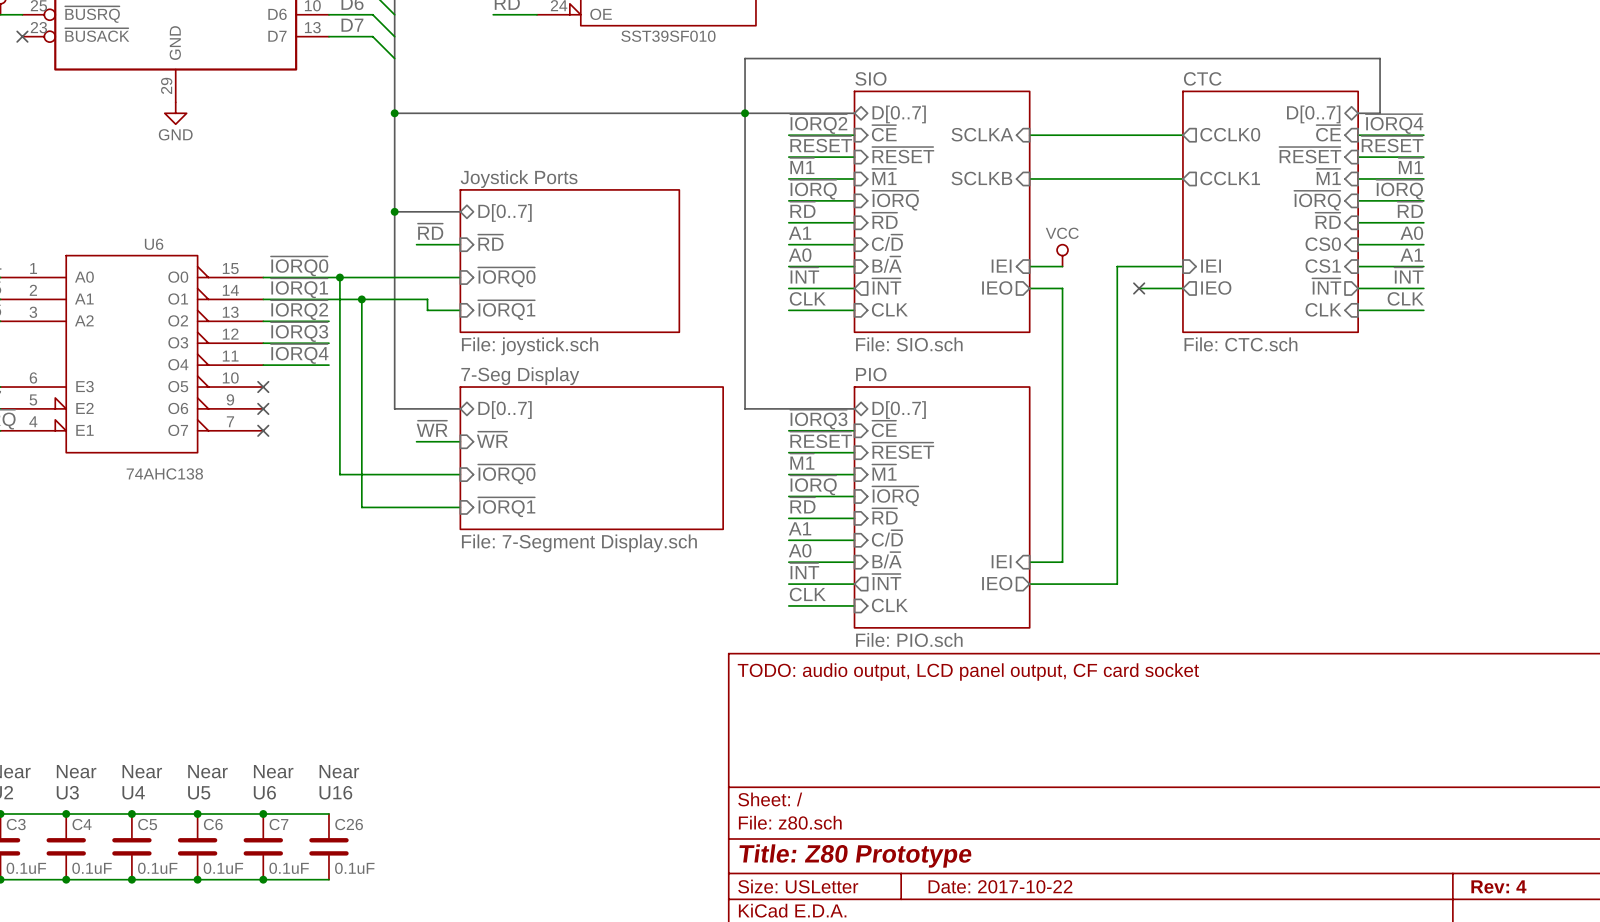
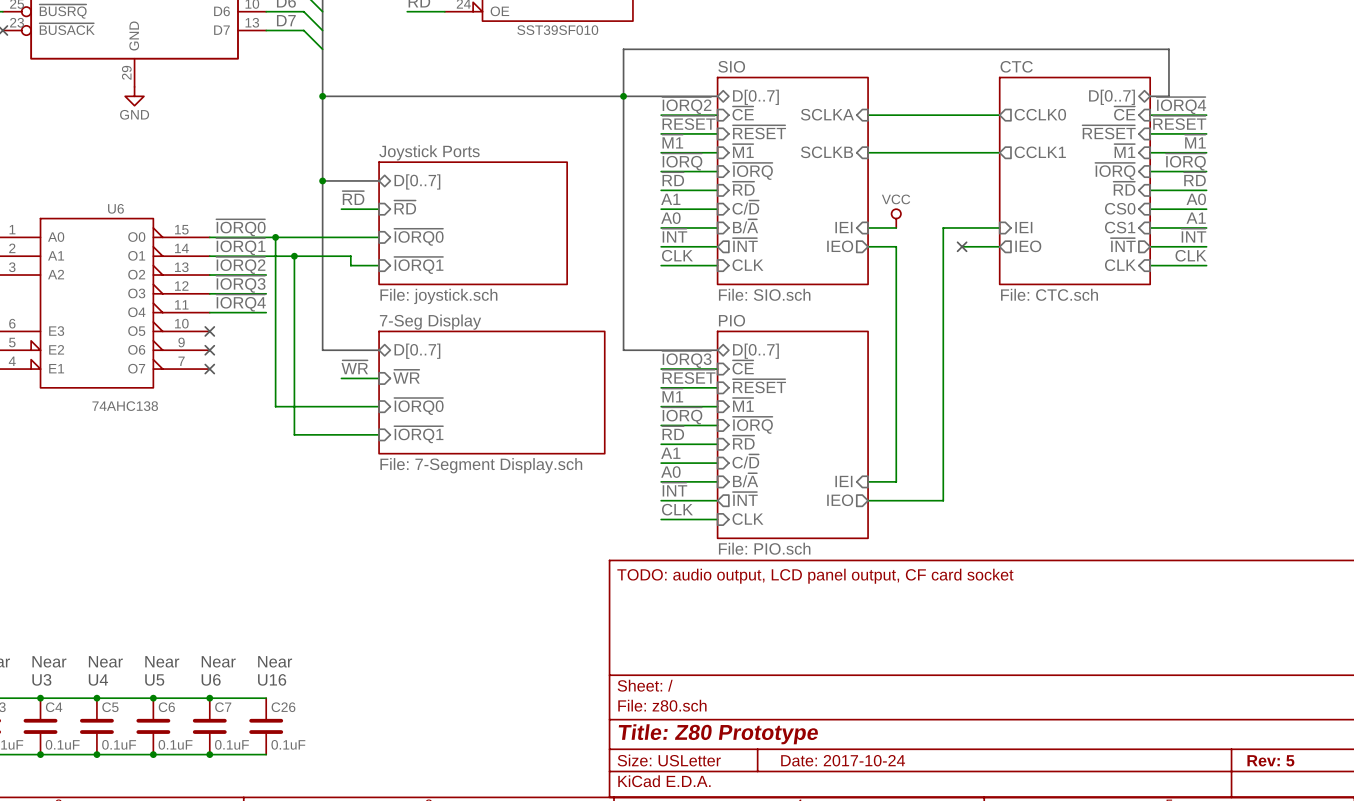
title block: Date: 2017-10-22 (1000, 886) -> Date: 2017-10-24 (843, 760)
title block: Rev: 4 (1498, 886) -> Rev: 5 (1270, 760)

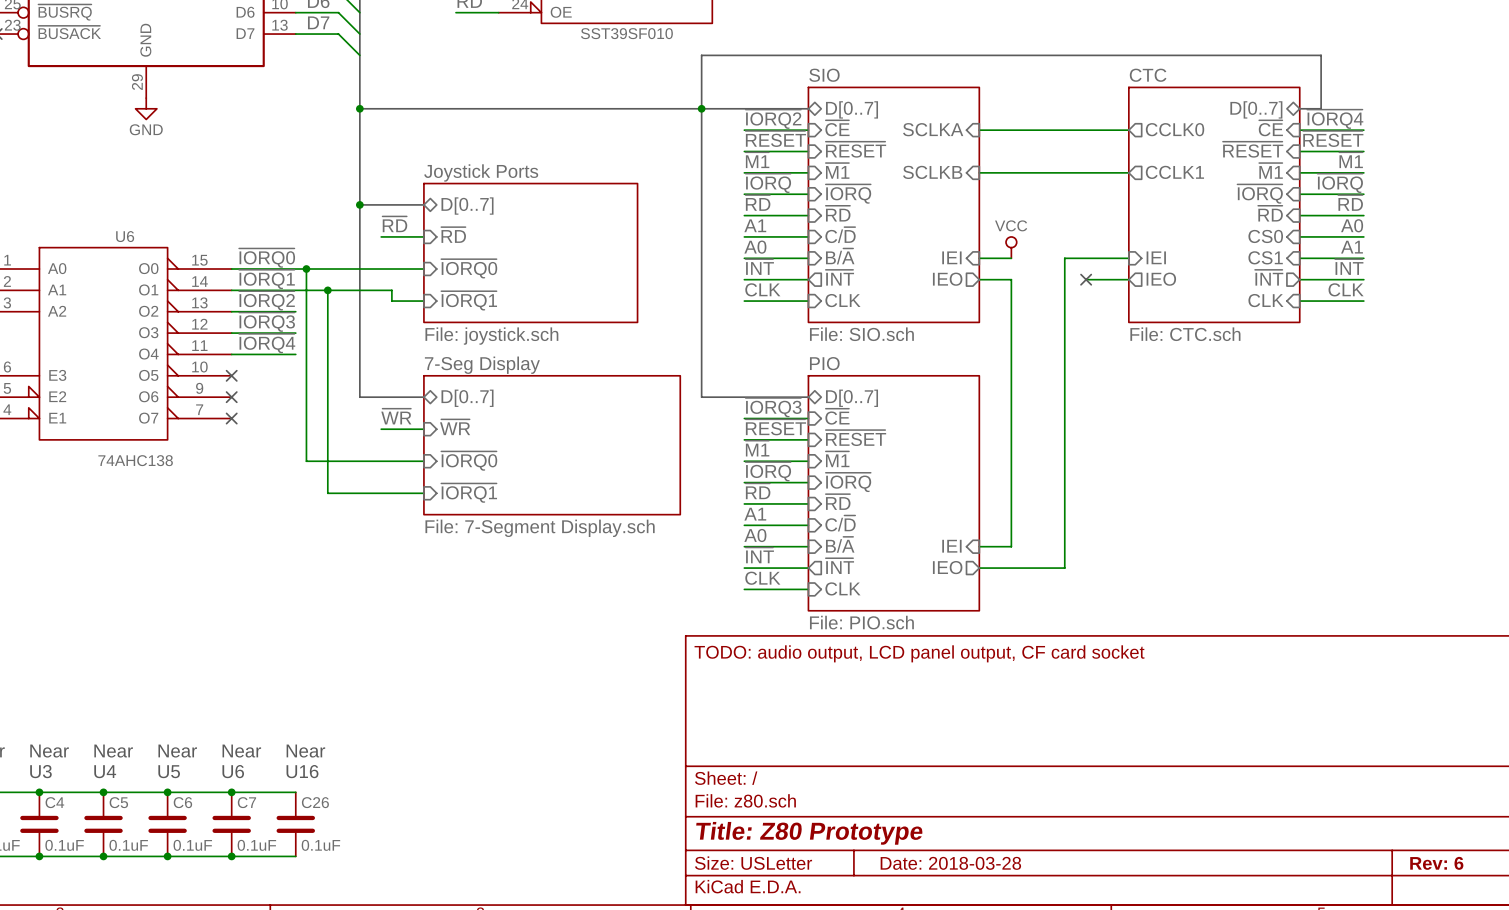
title block: Date: 2017-10-24 (843, 760) -> Date: 2018-03-28 (950, 863)
title block: Rev: 5 (1270, 760) -> Rev: 6 (1436, 863)

